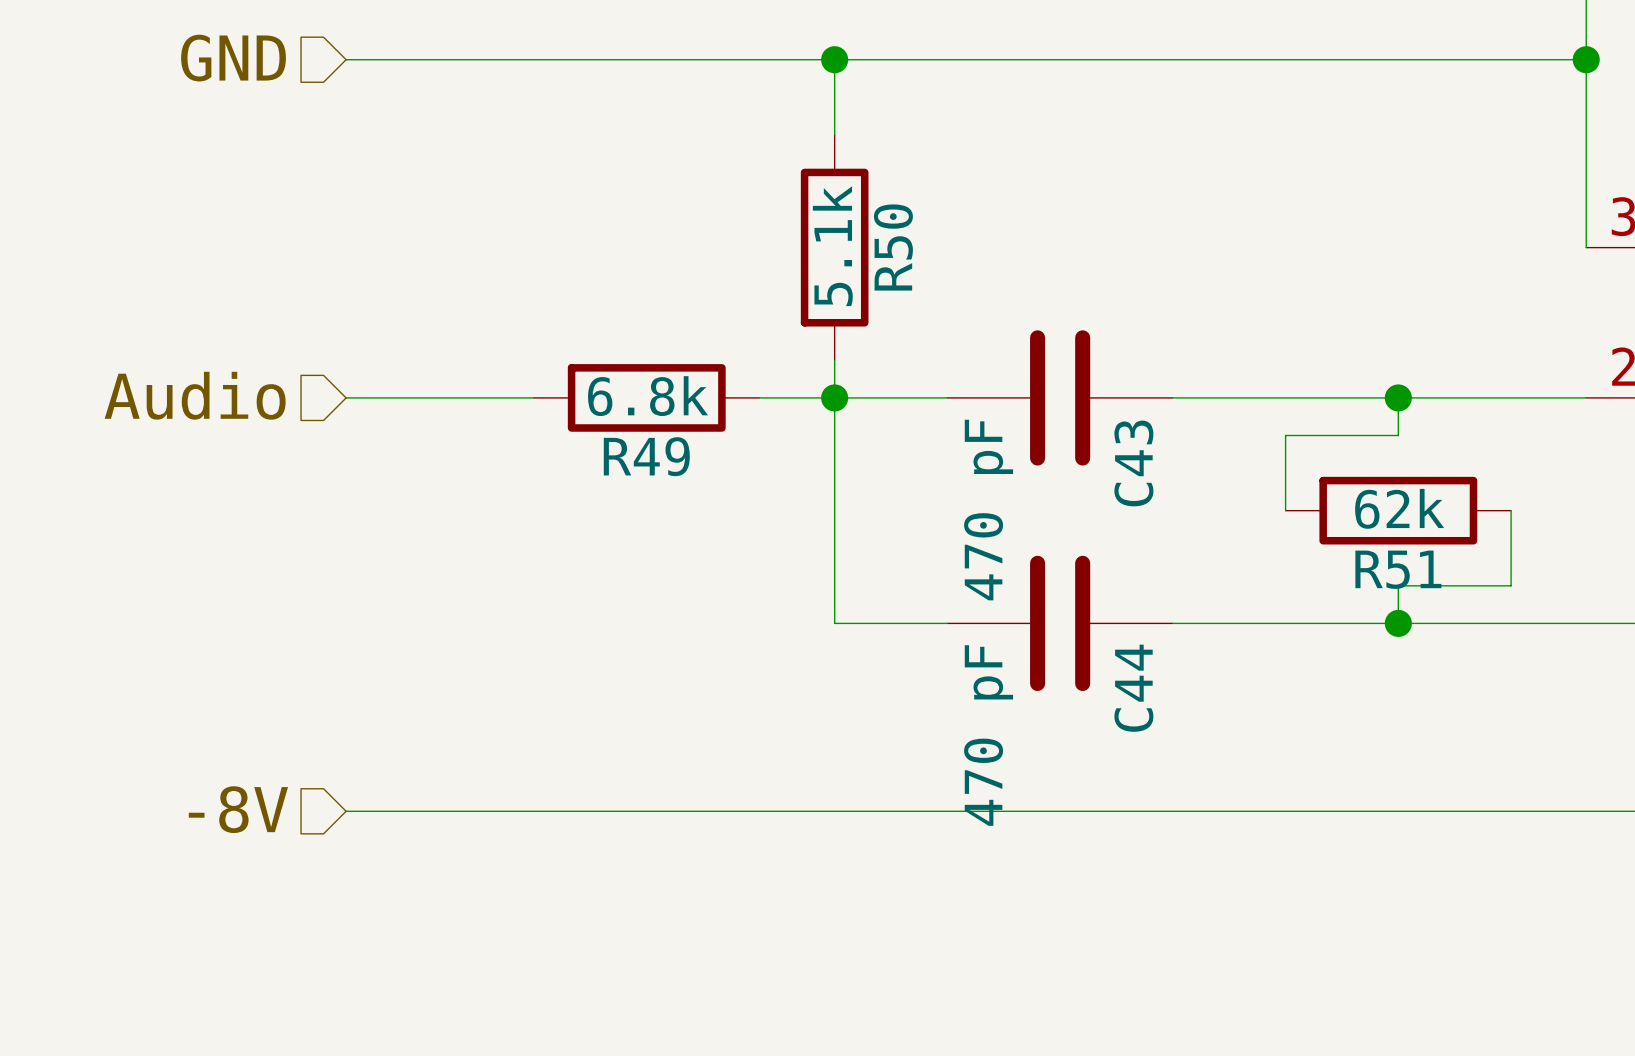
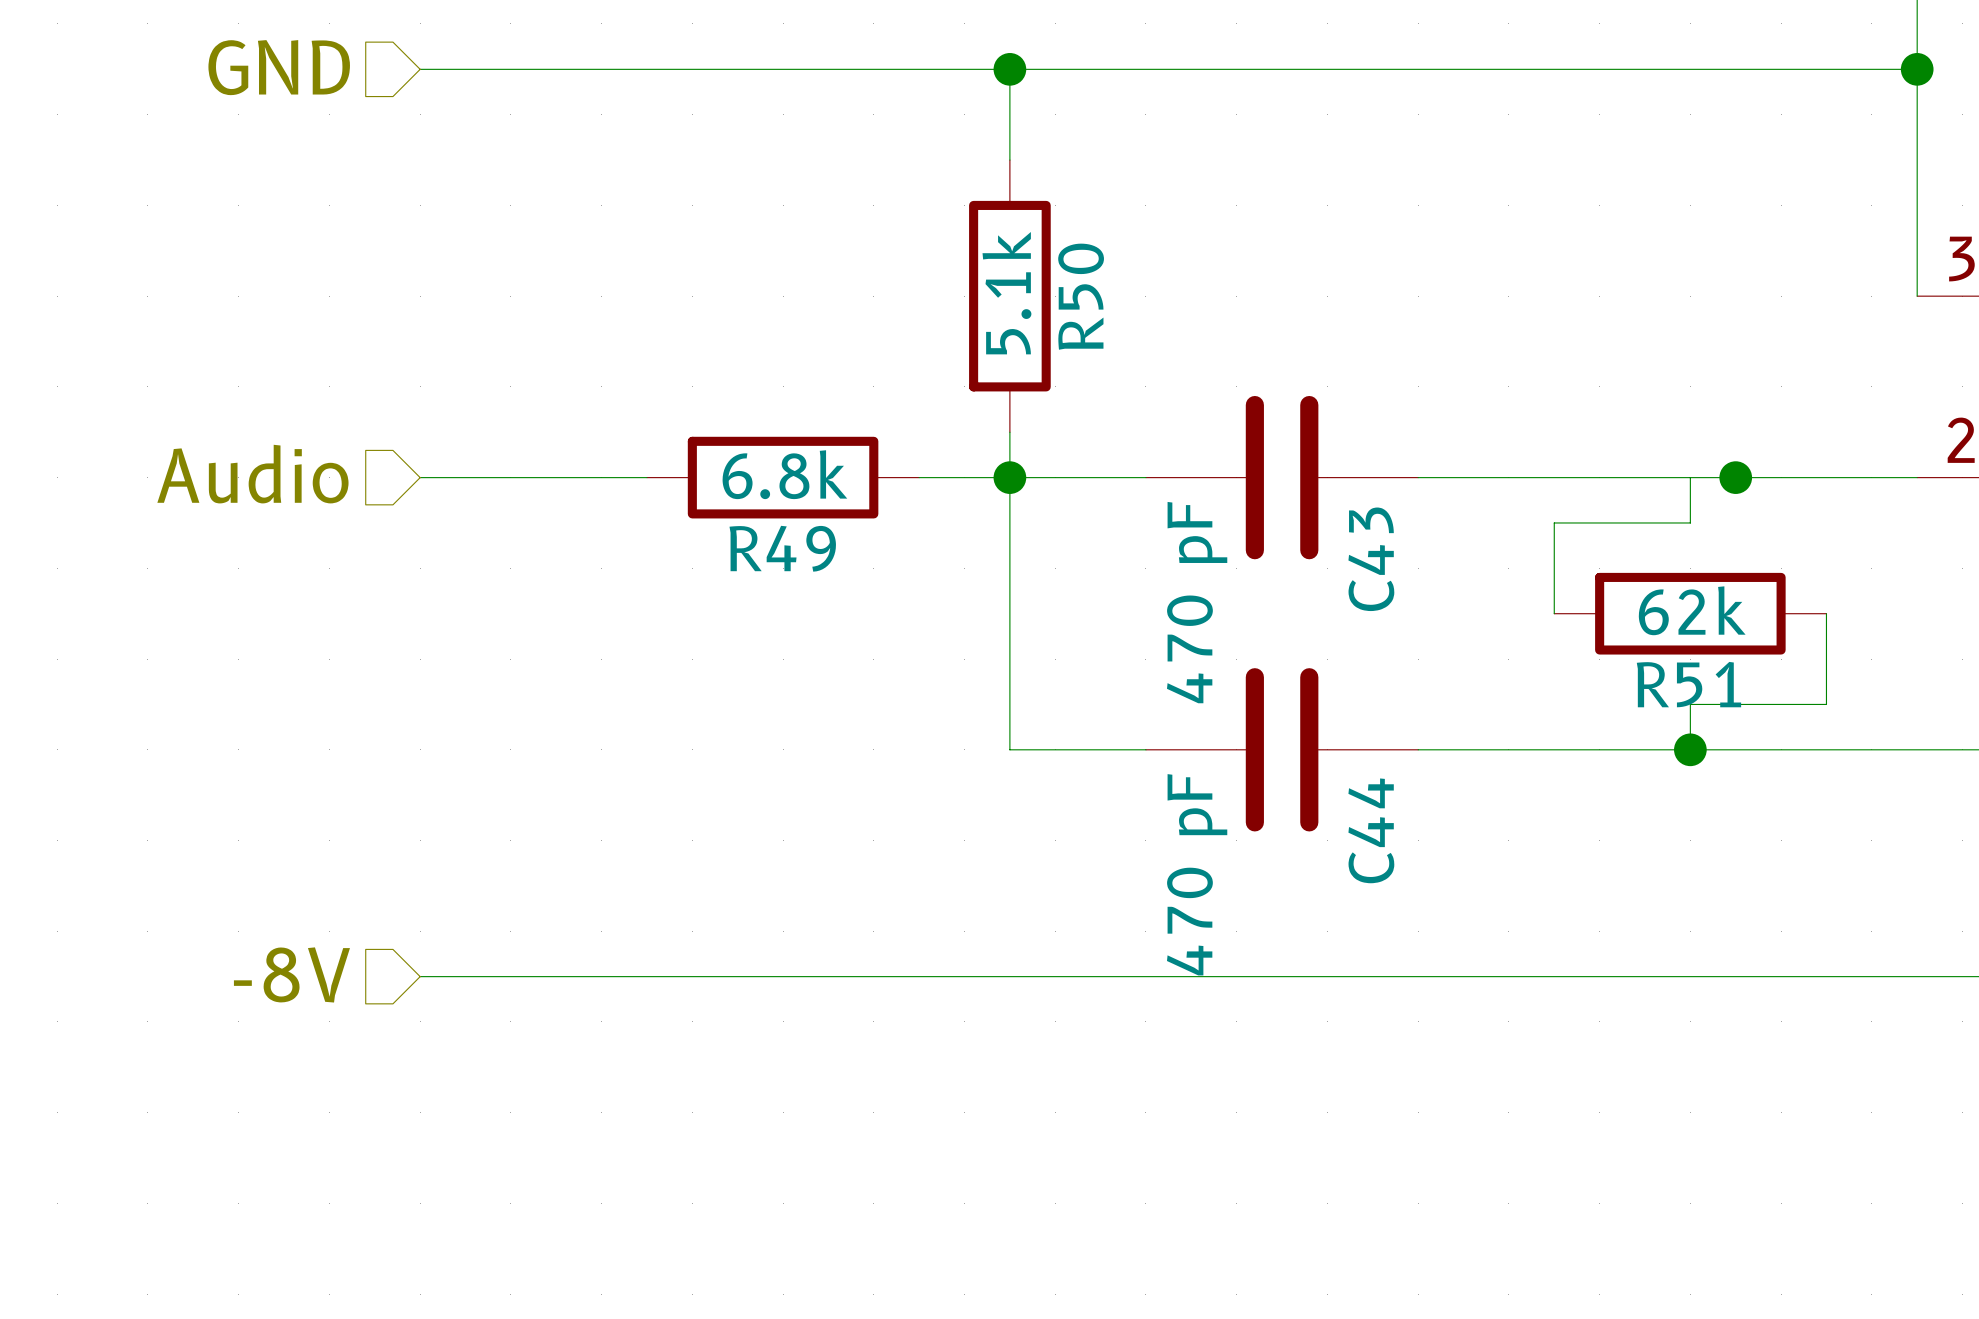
junction position: (1398, 397) -> (1735, 477)

